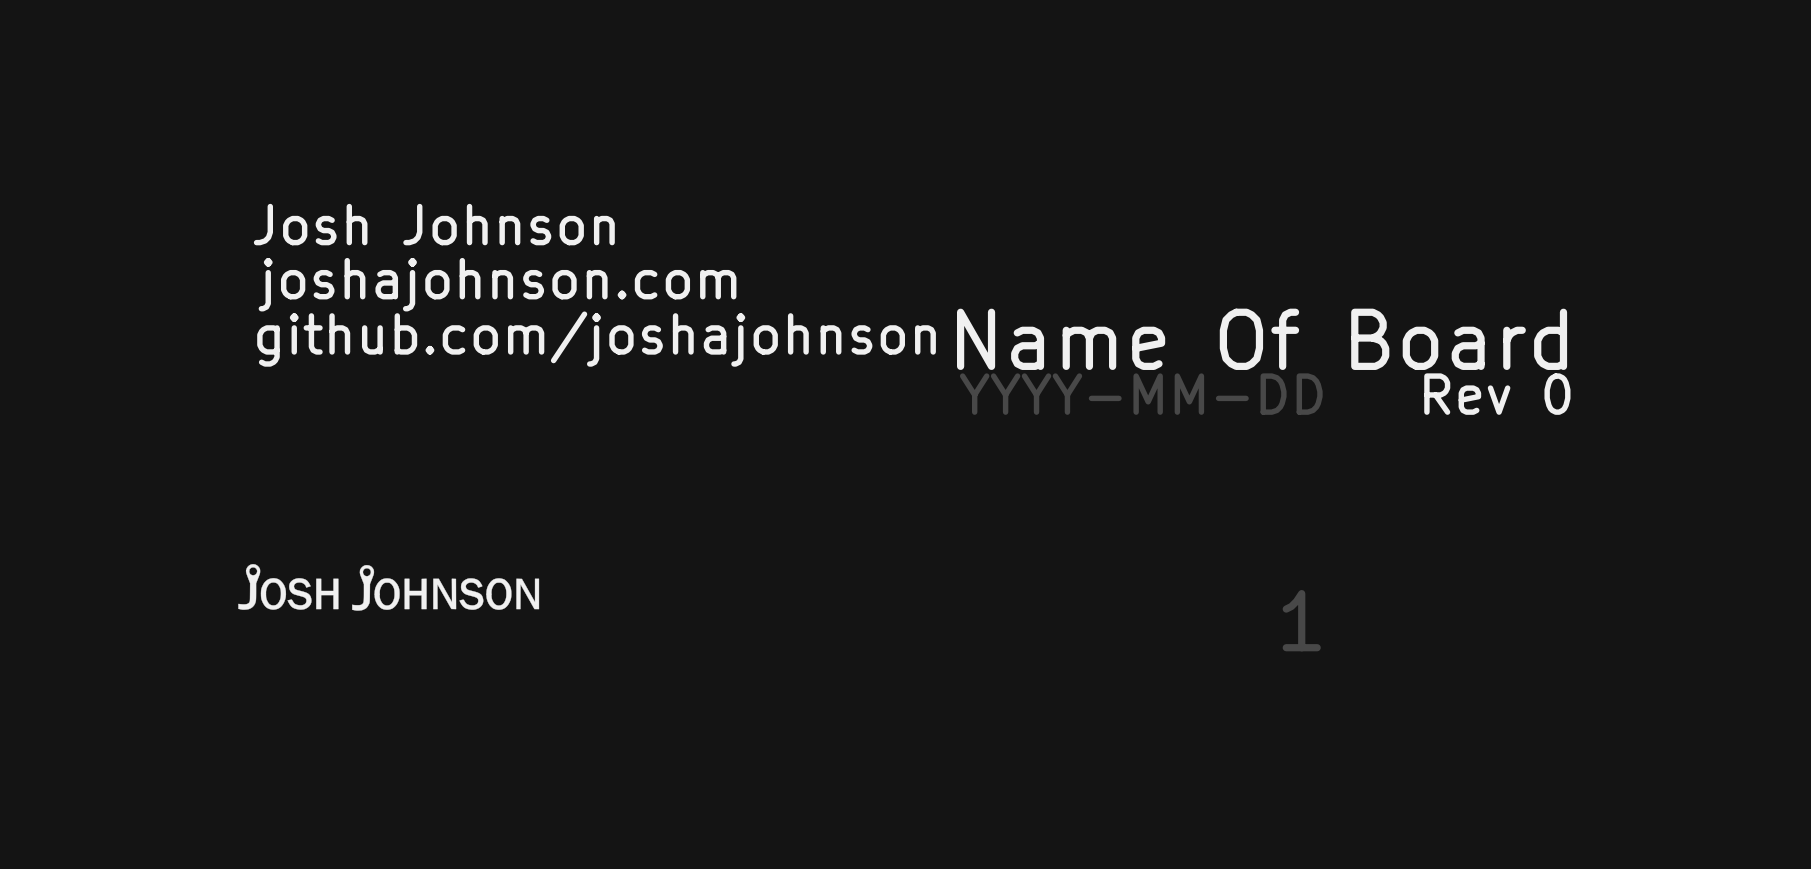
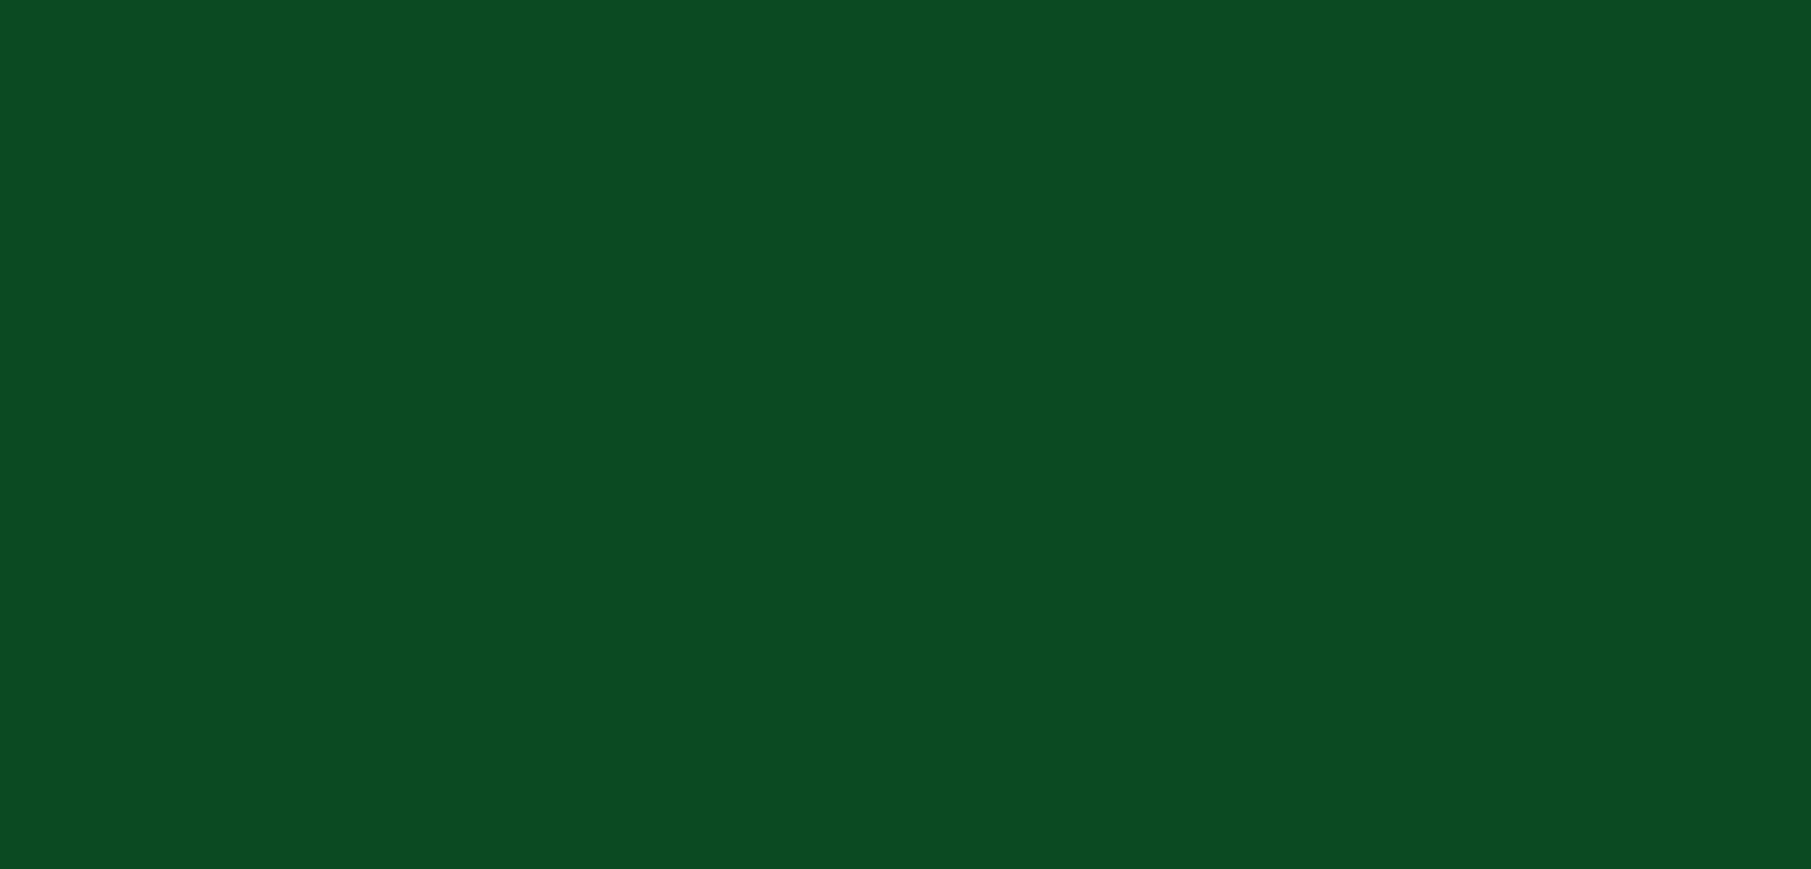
drawing: [253, 203, 1571, 415] -> none
drawing: [238, 564, 540, 611] -> none
drawing: [1282, 590, 1321, 652] -> none

